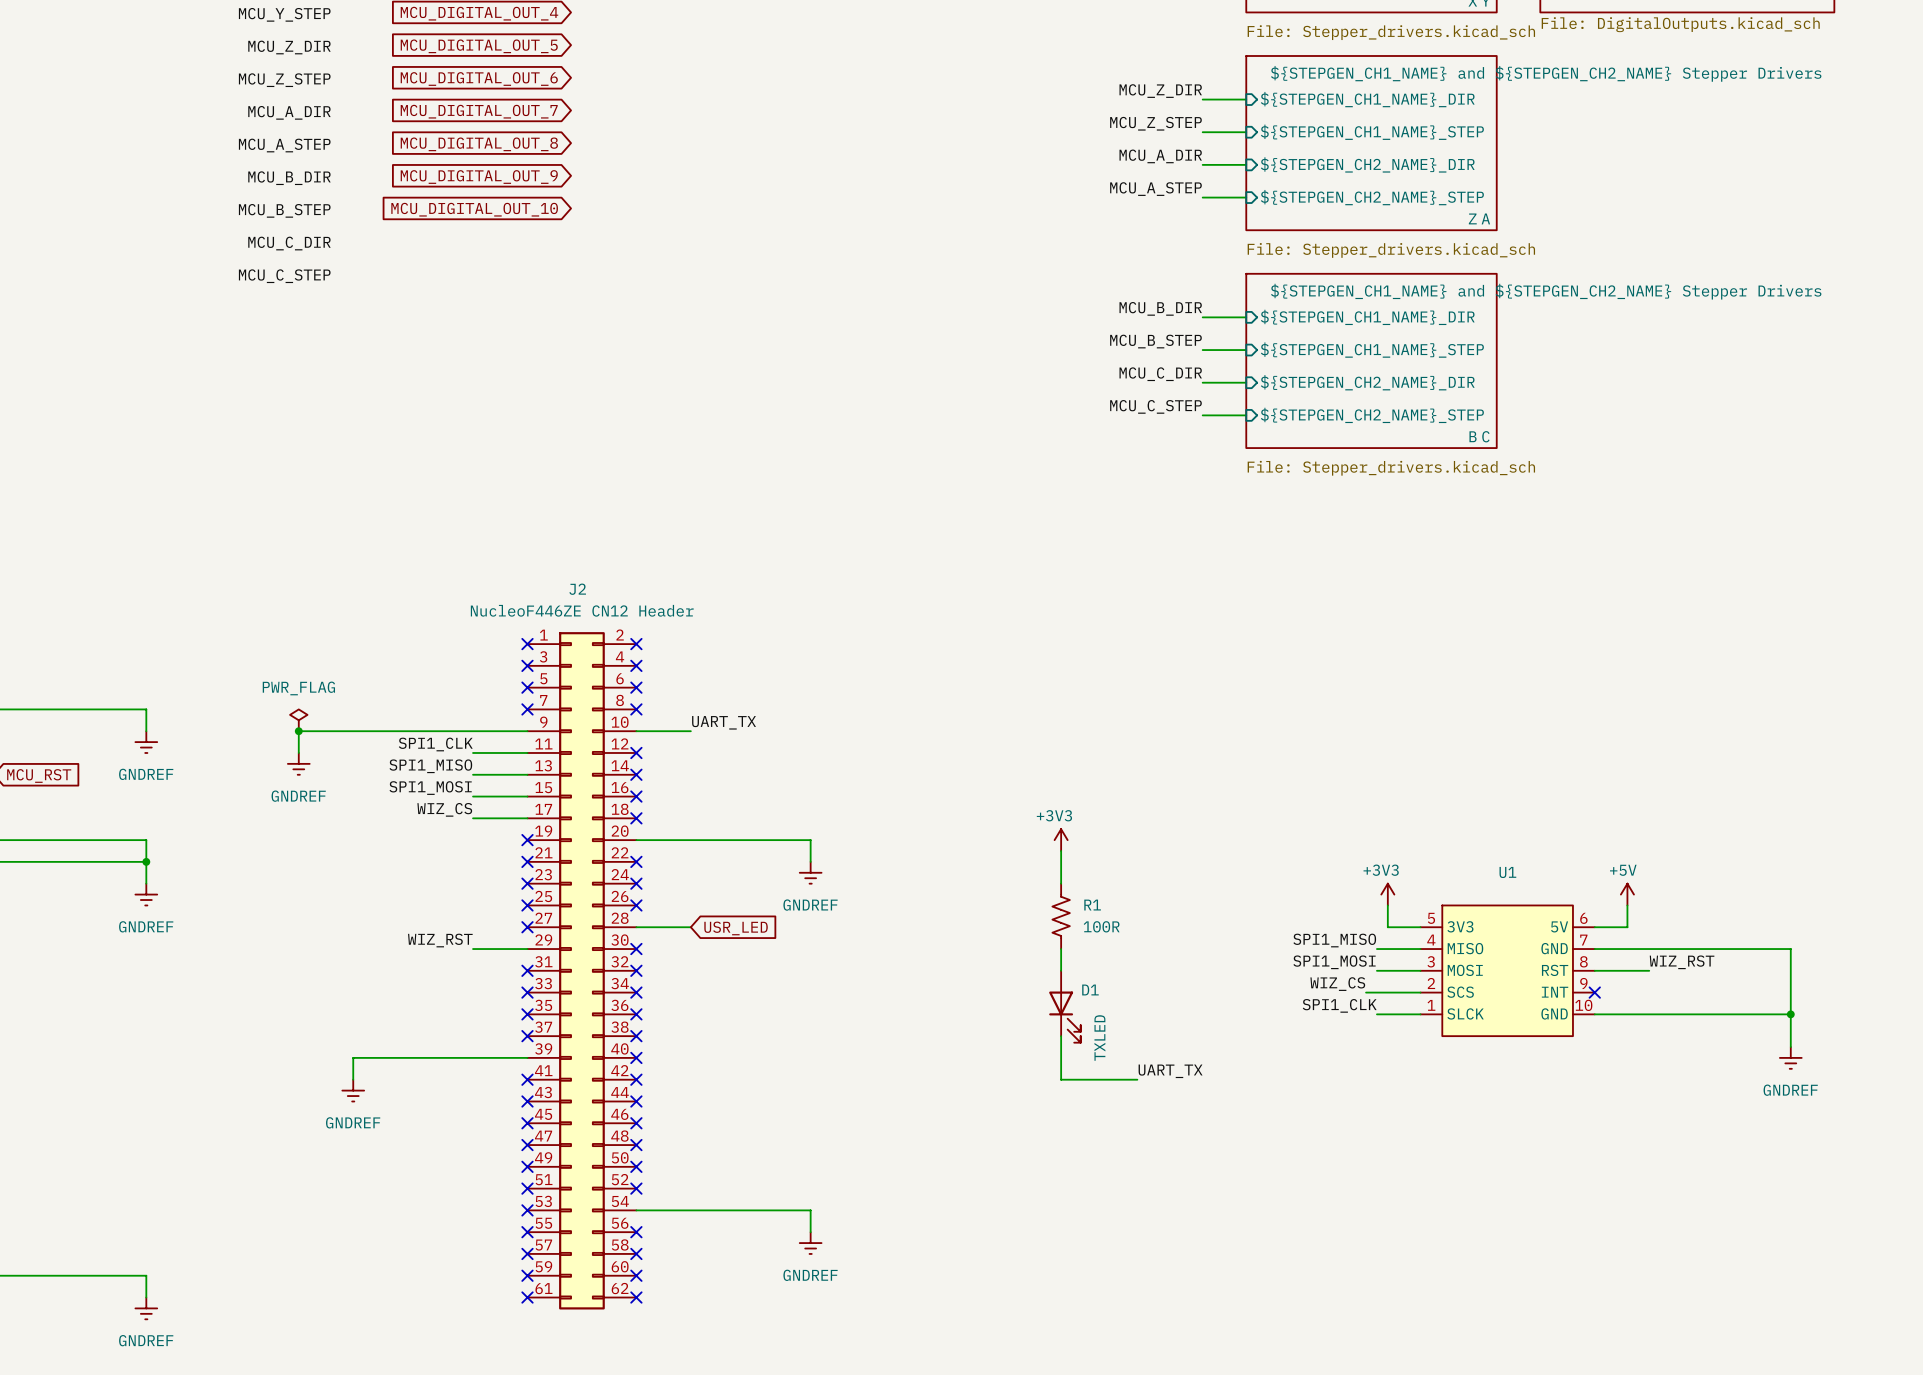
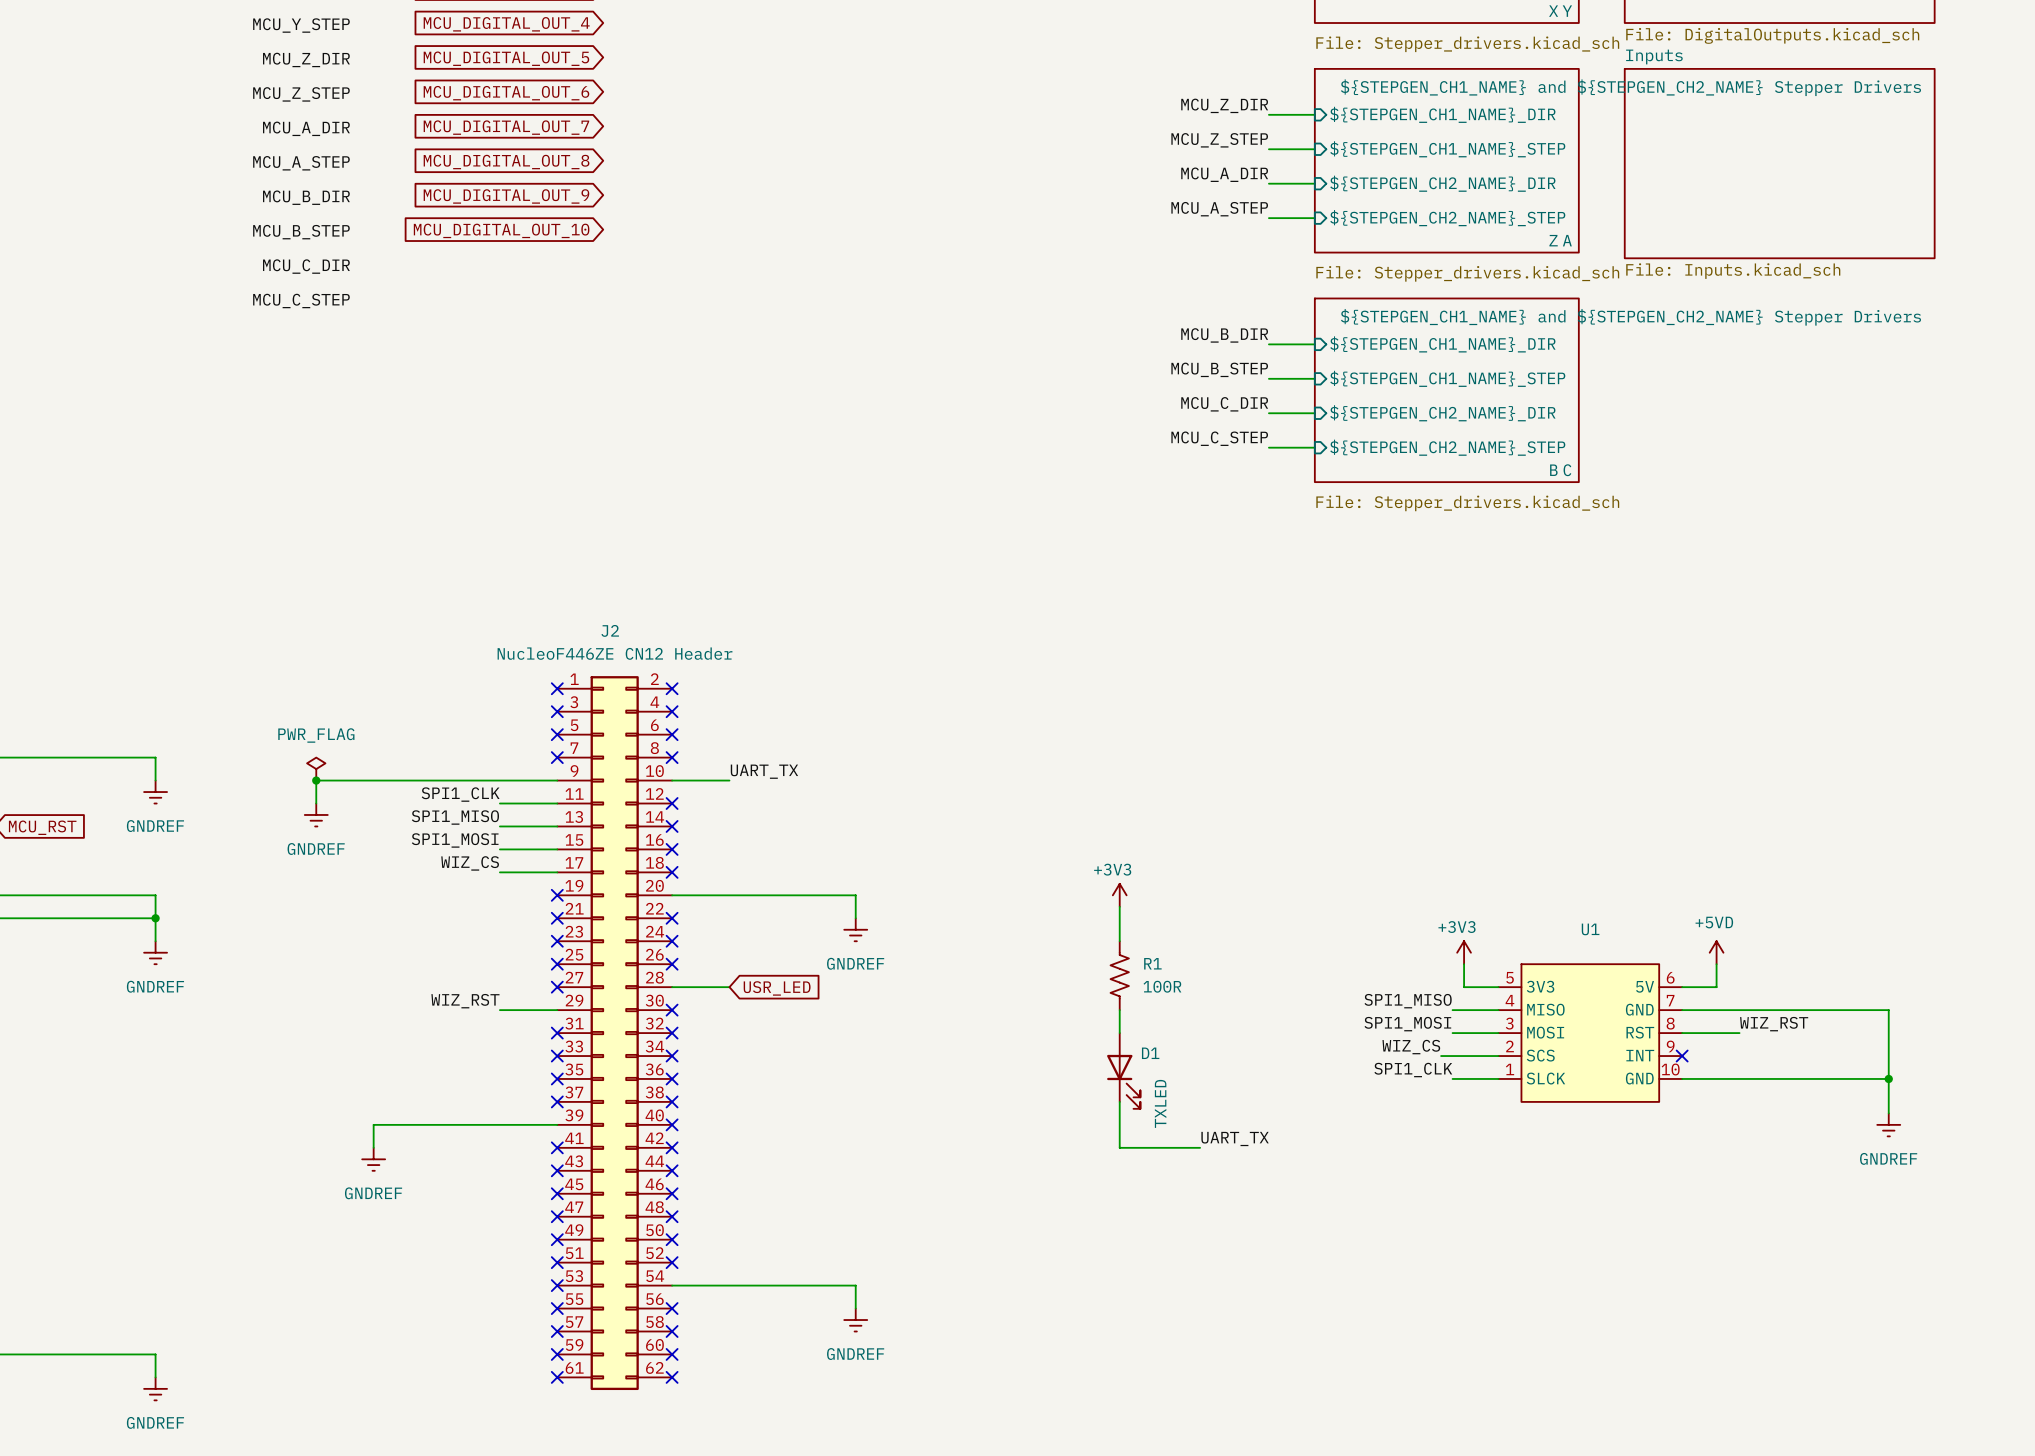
sheet Inputs: none -> File: Inputs.kicad_sch (1779, 163)
power symbol: +5V (1627, 894) -> +5VD (1716, 952)

